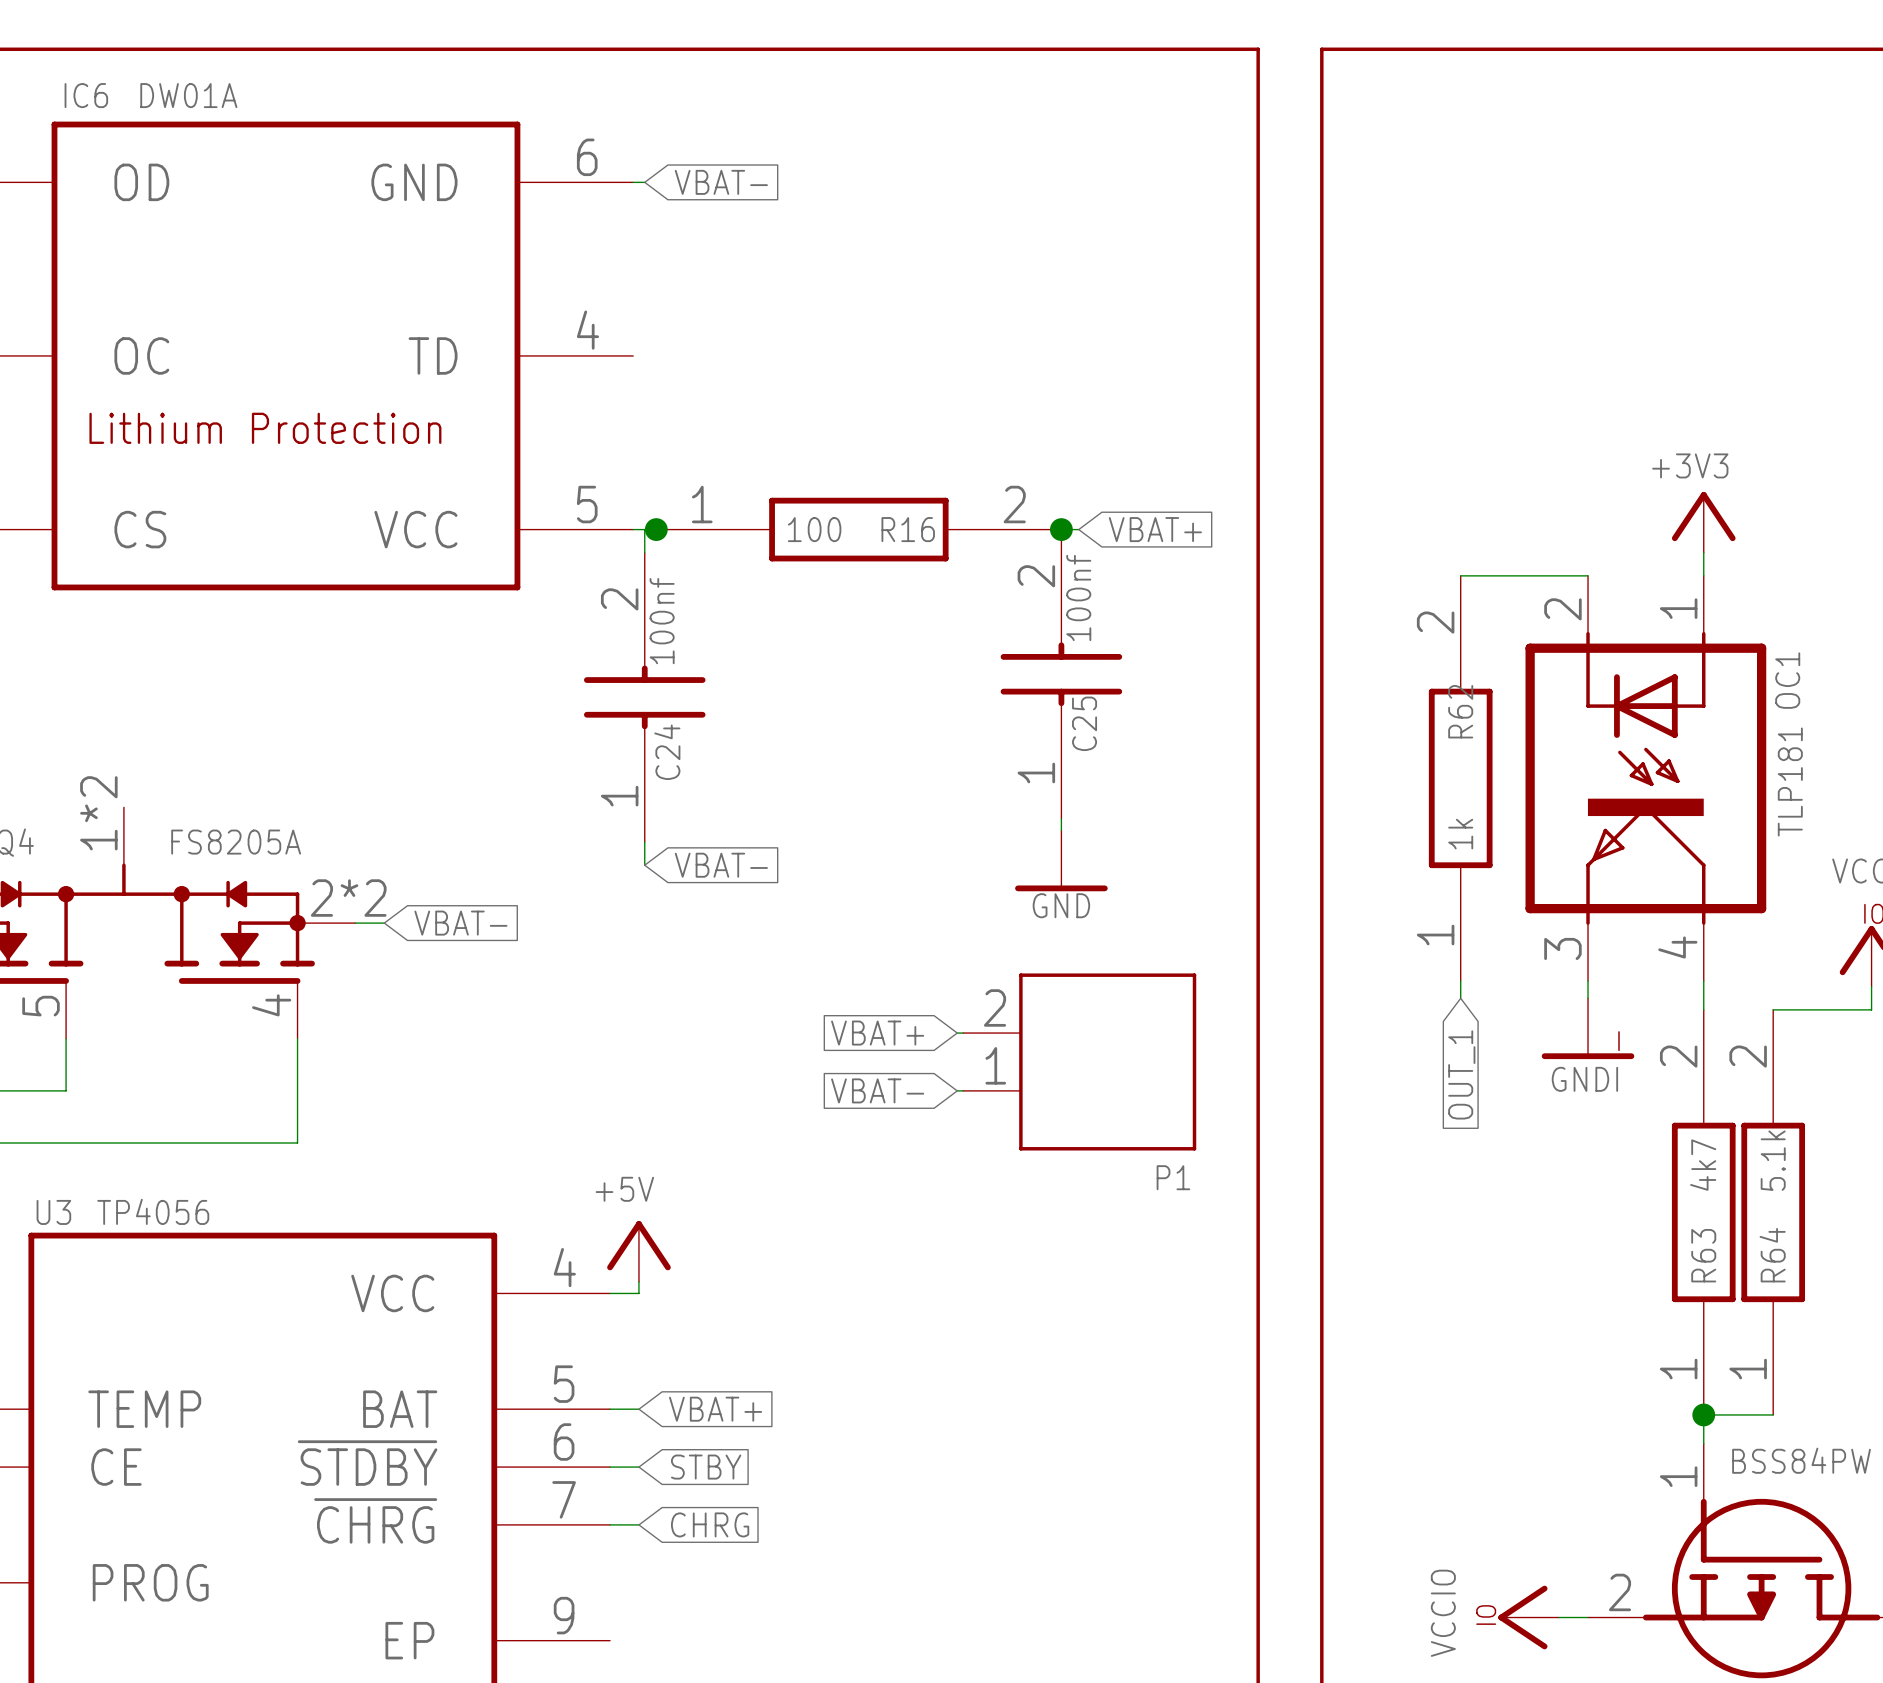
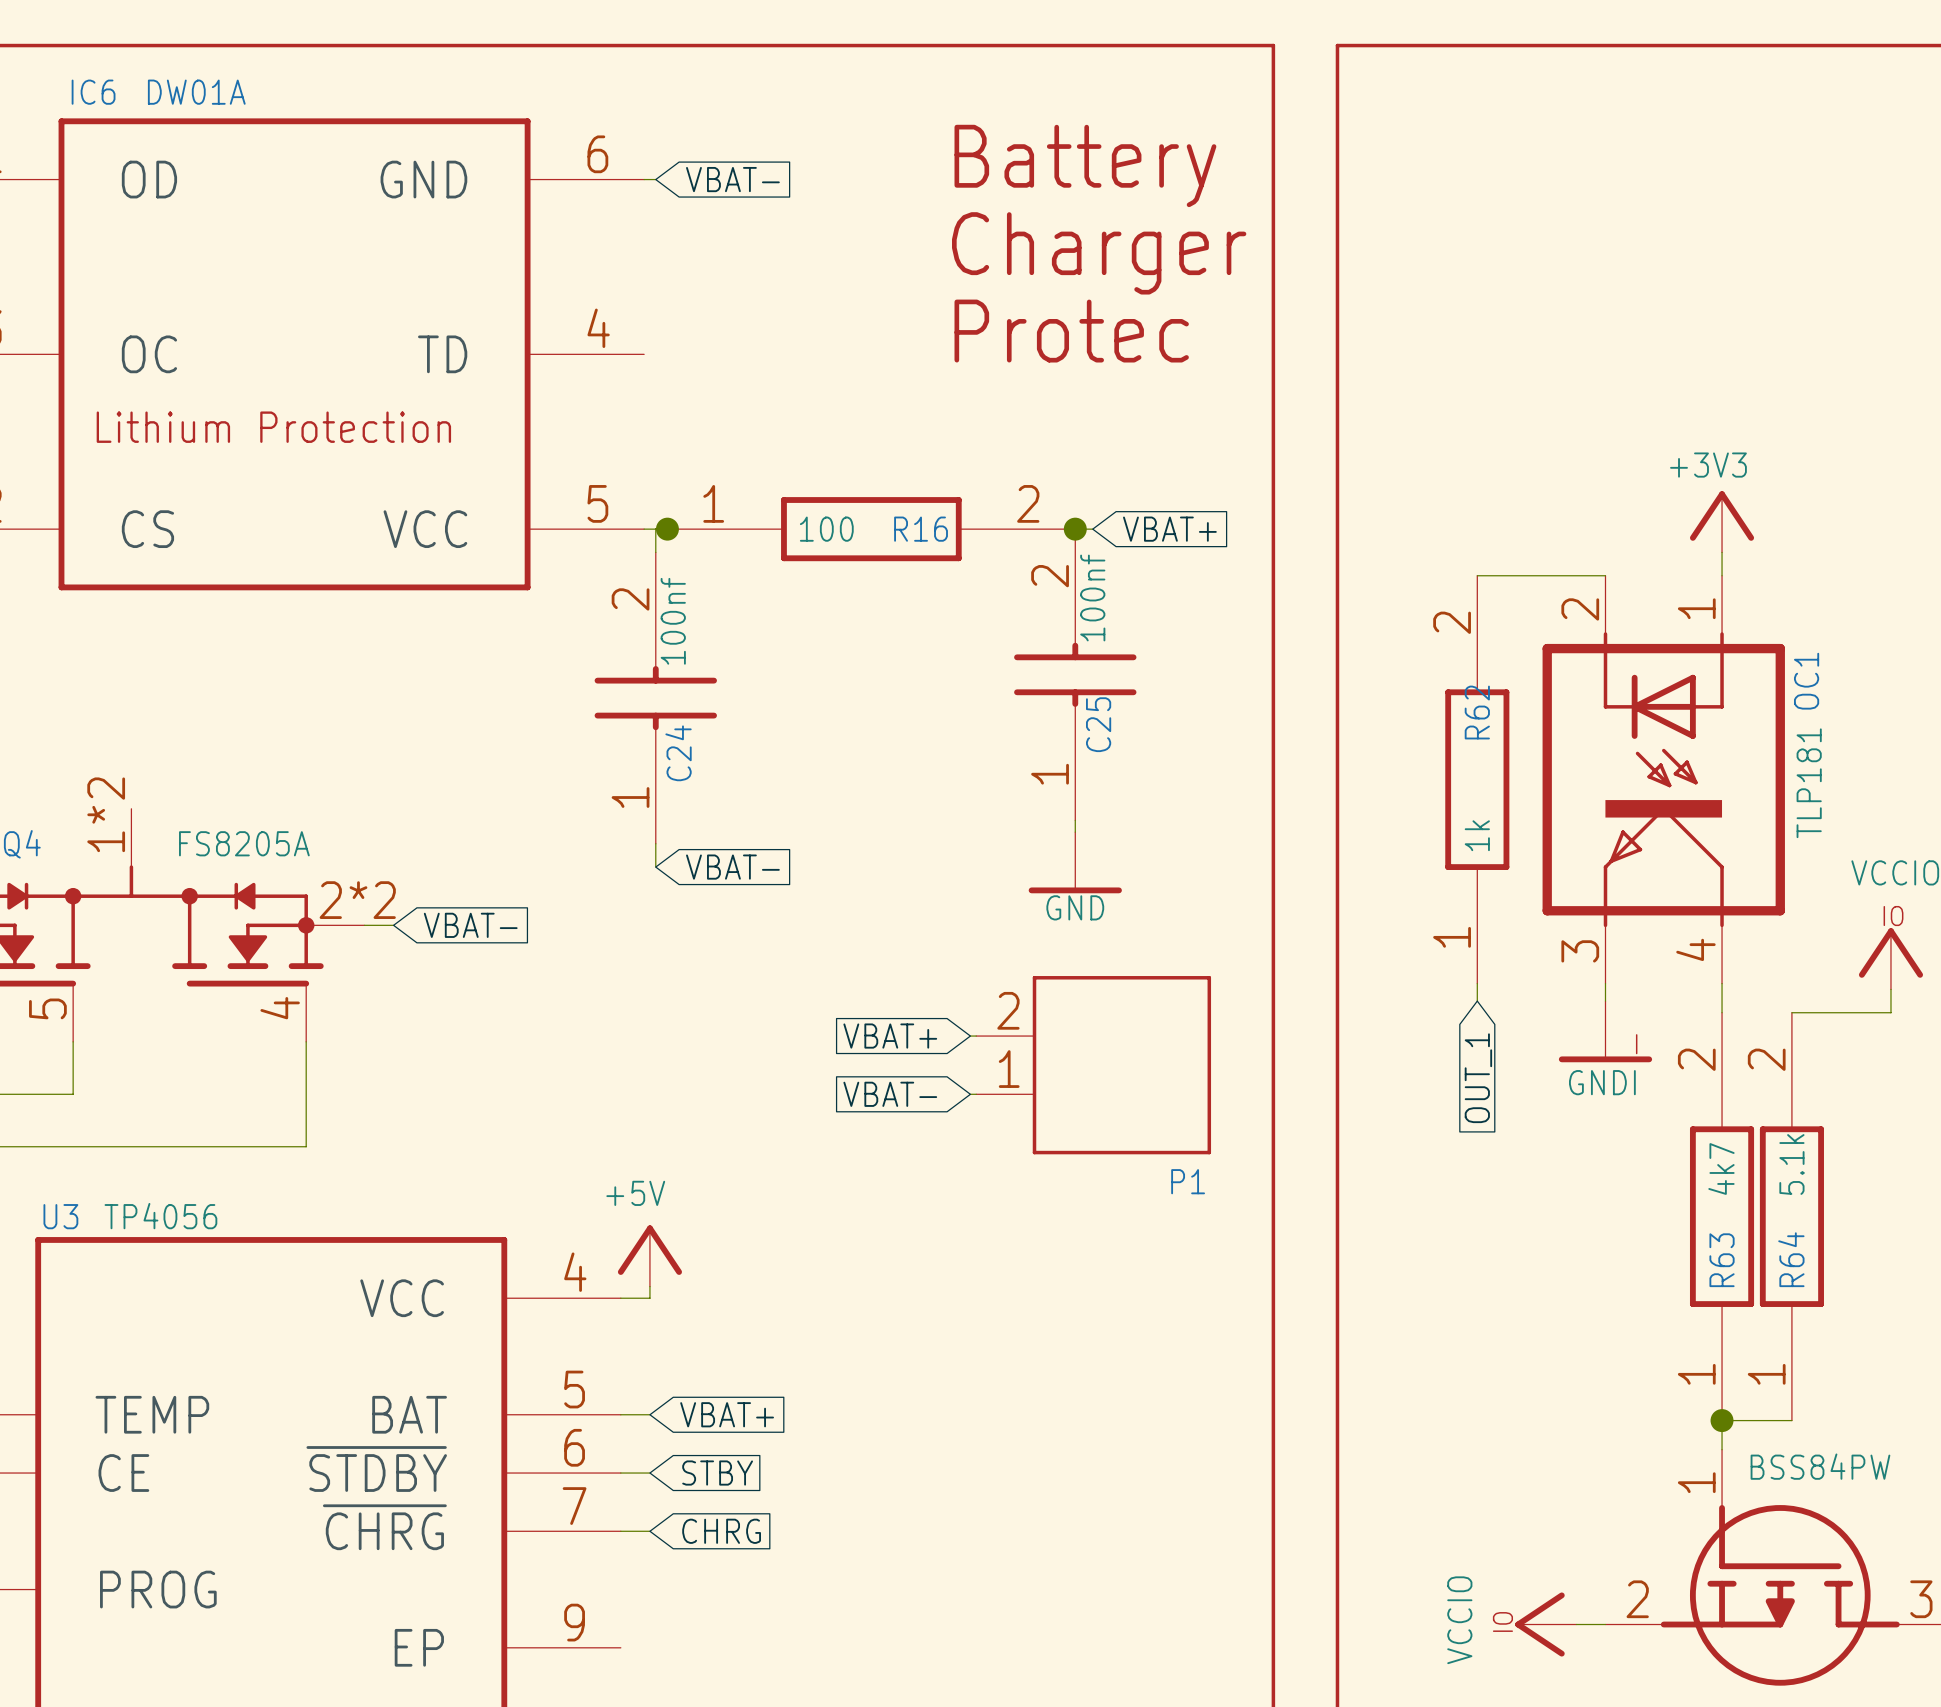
text: none -> Battery (1085, 165)
text: none -> Charger (1099, 253)
text: none -> Protec (1071, 331)

